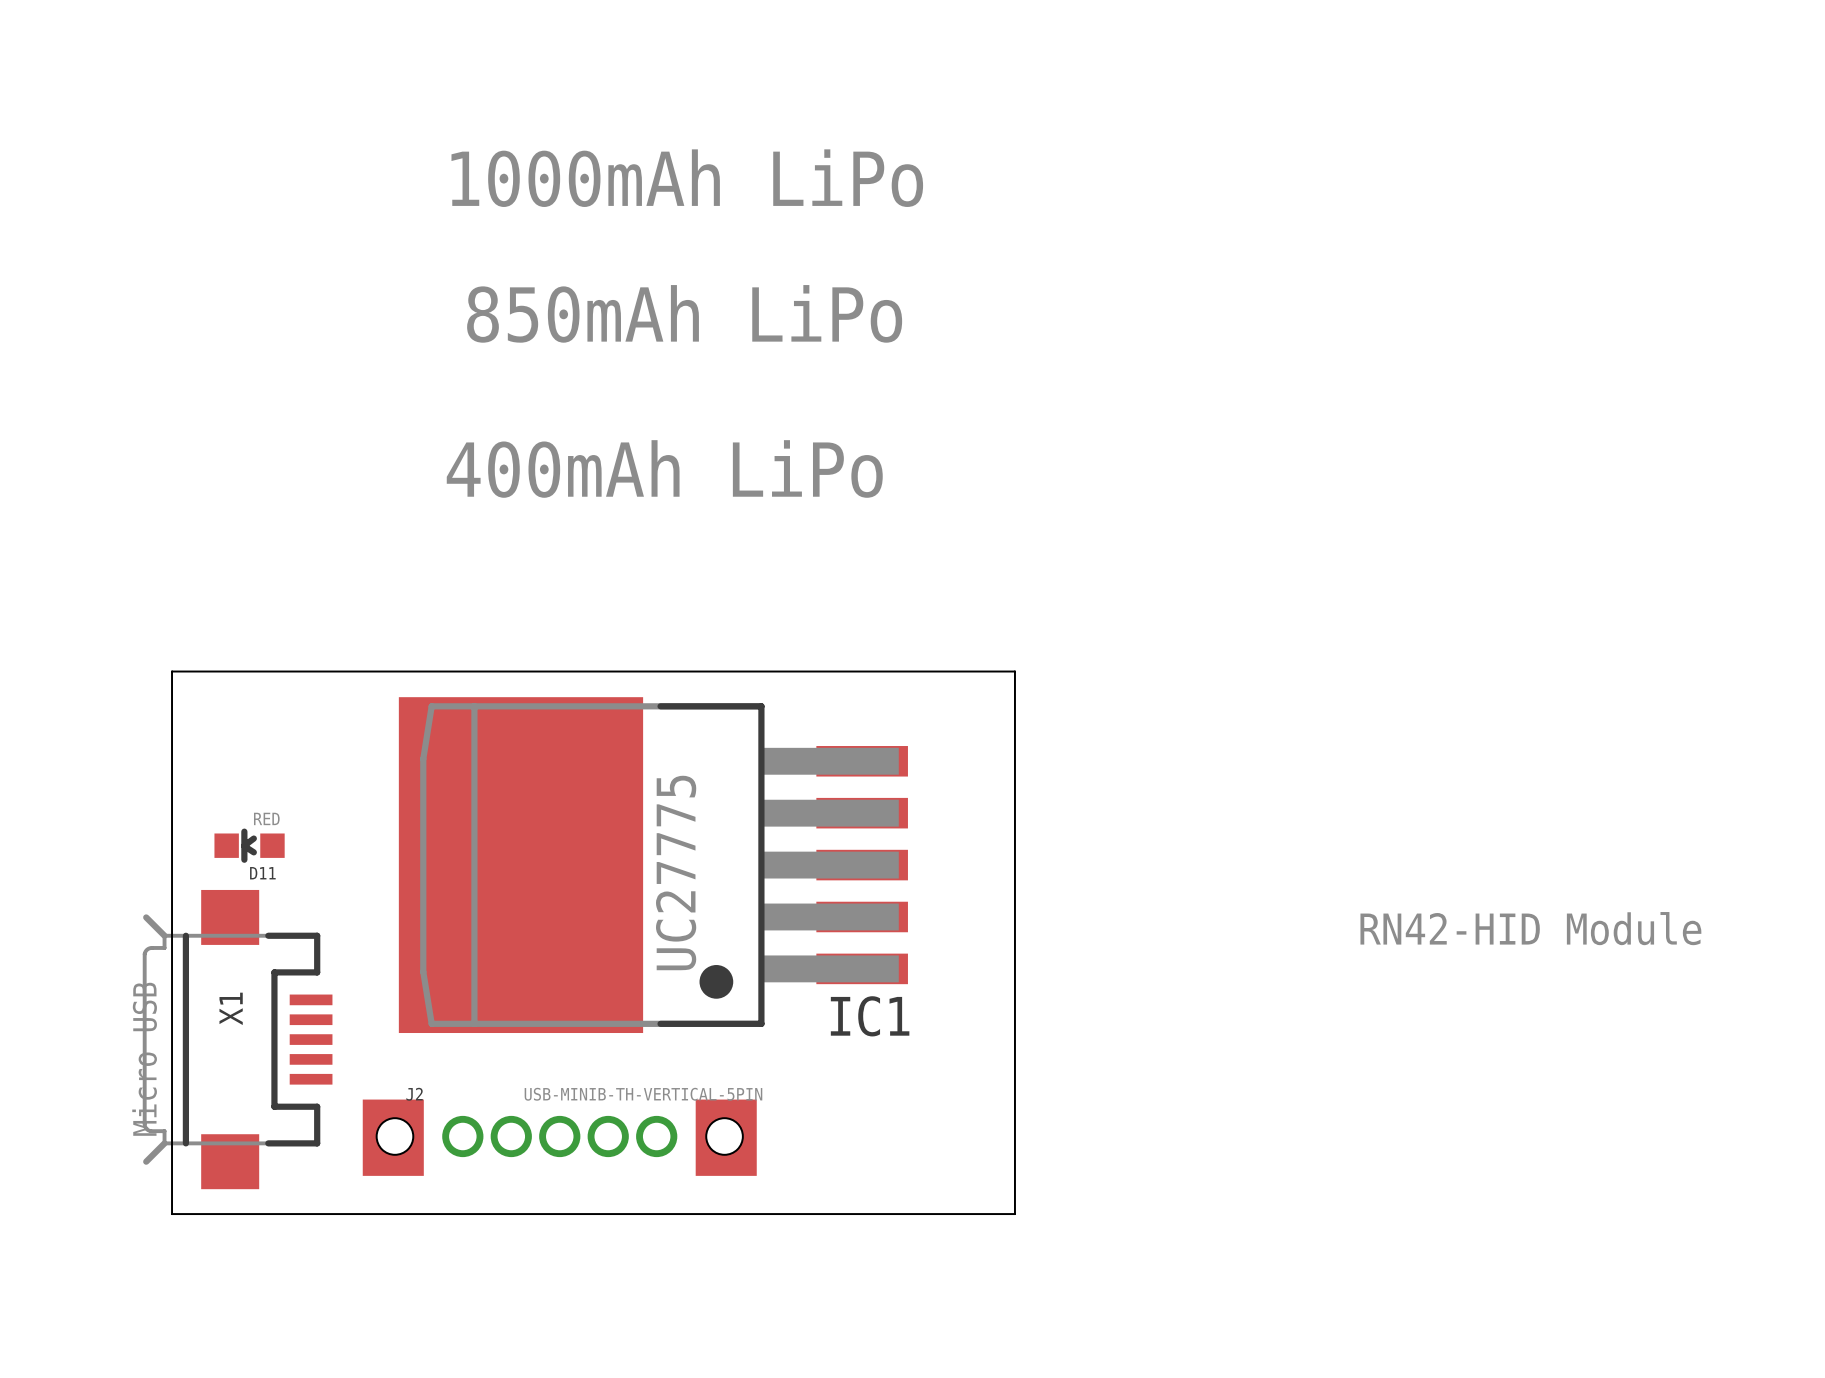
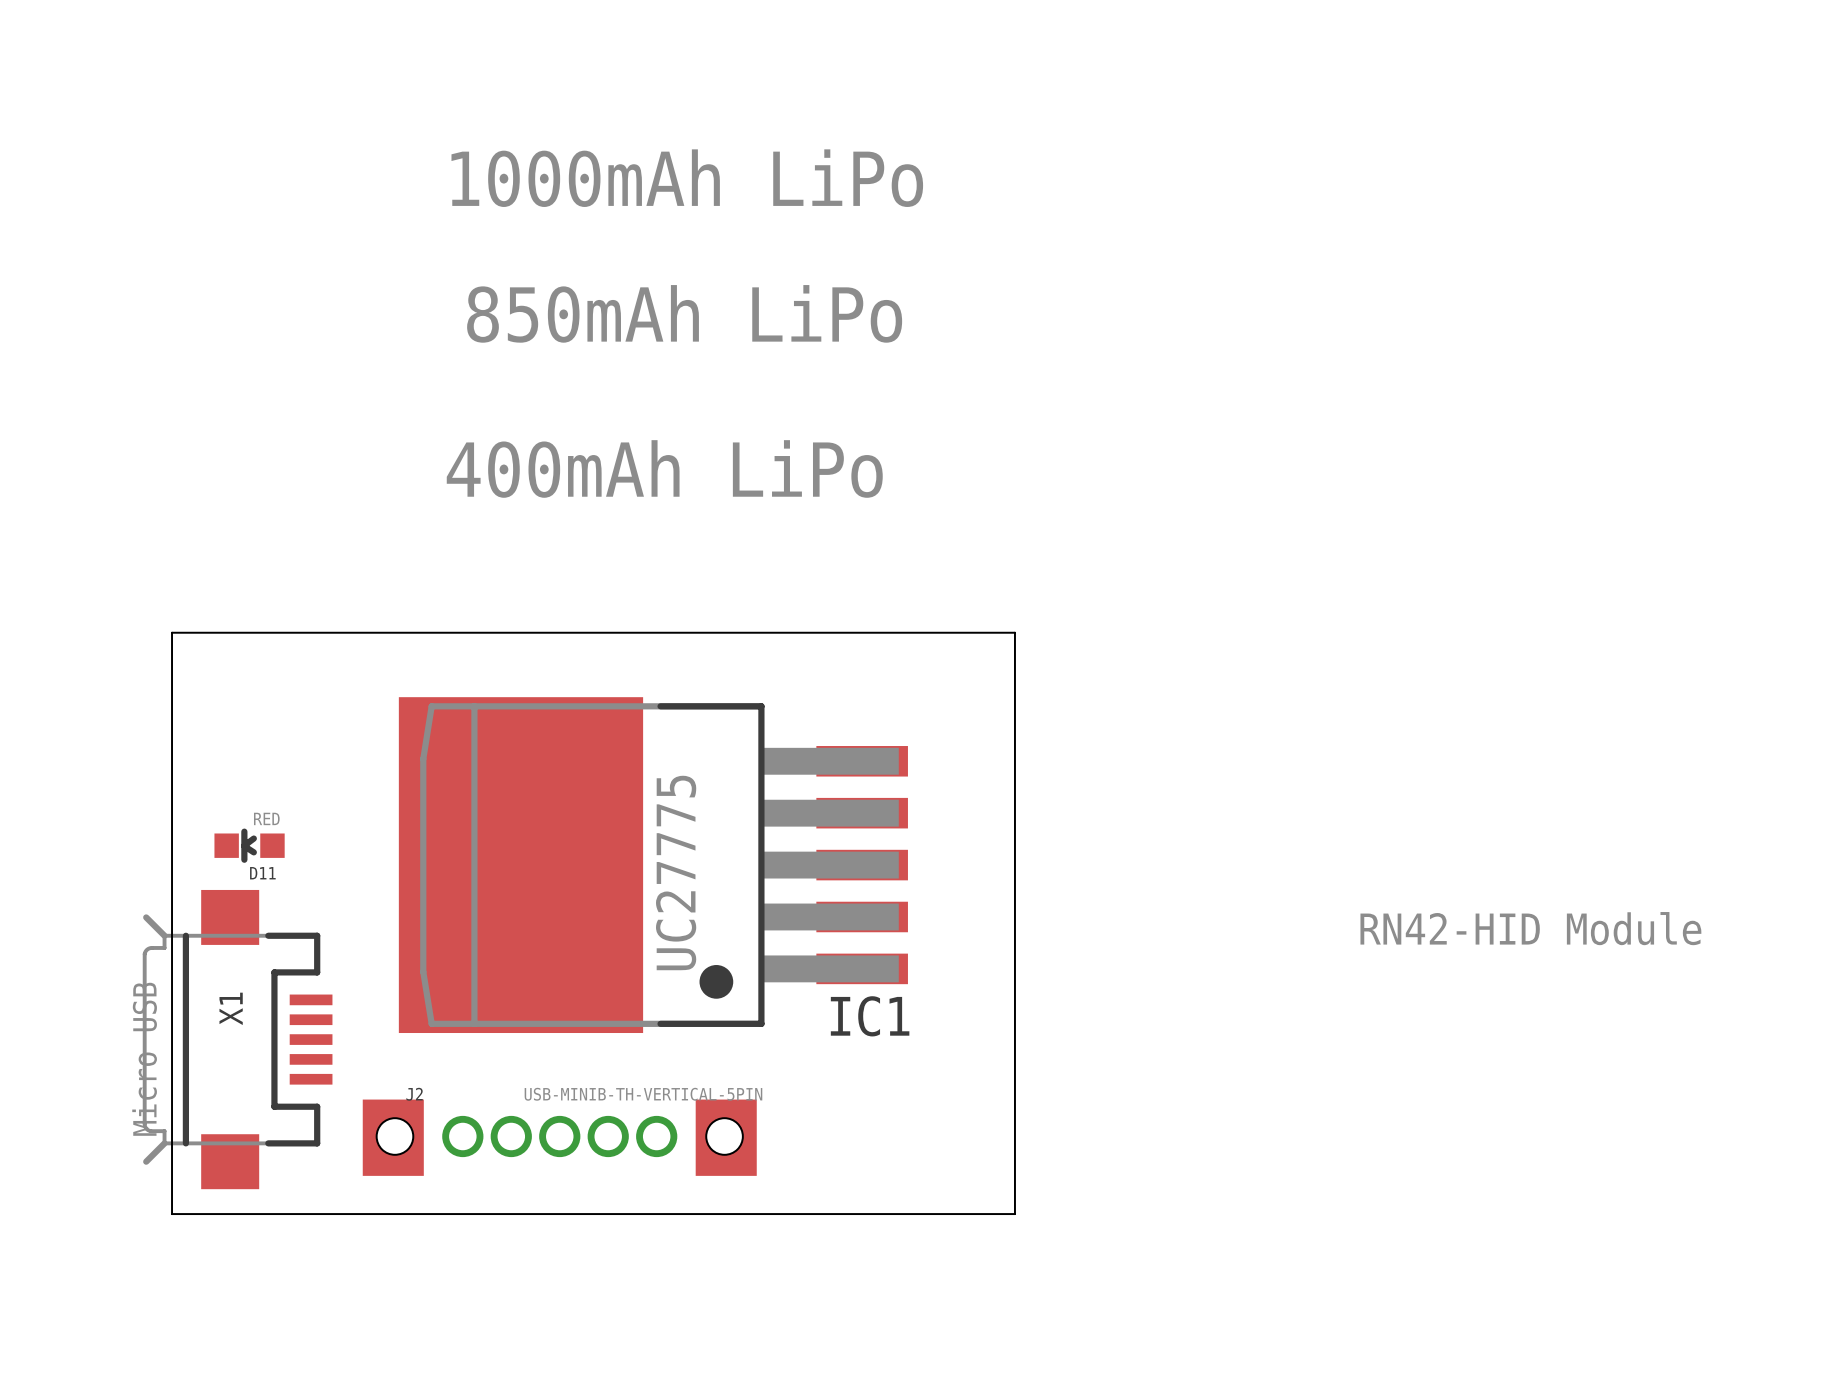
board edge: (172, 671) (1014, 671) -> (172, 671) (172, 632) (1014, 632) (1014, 671)

